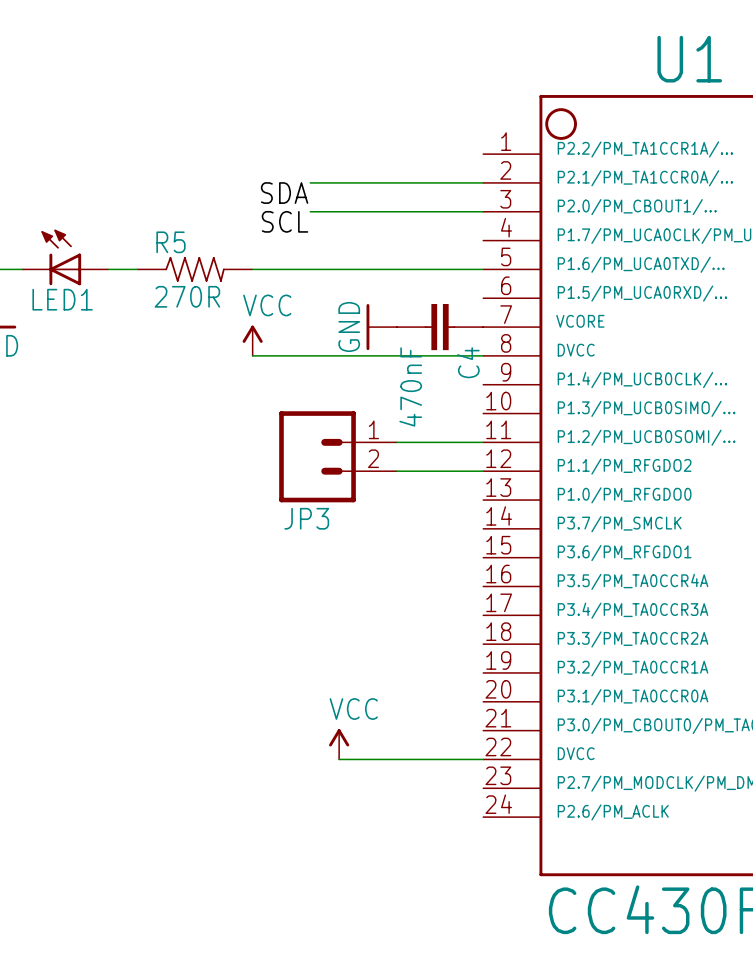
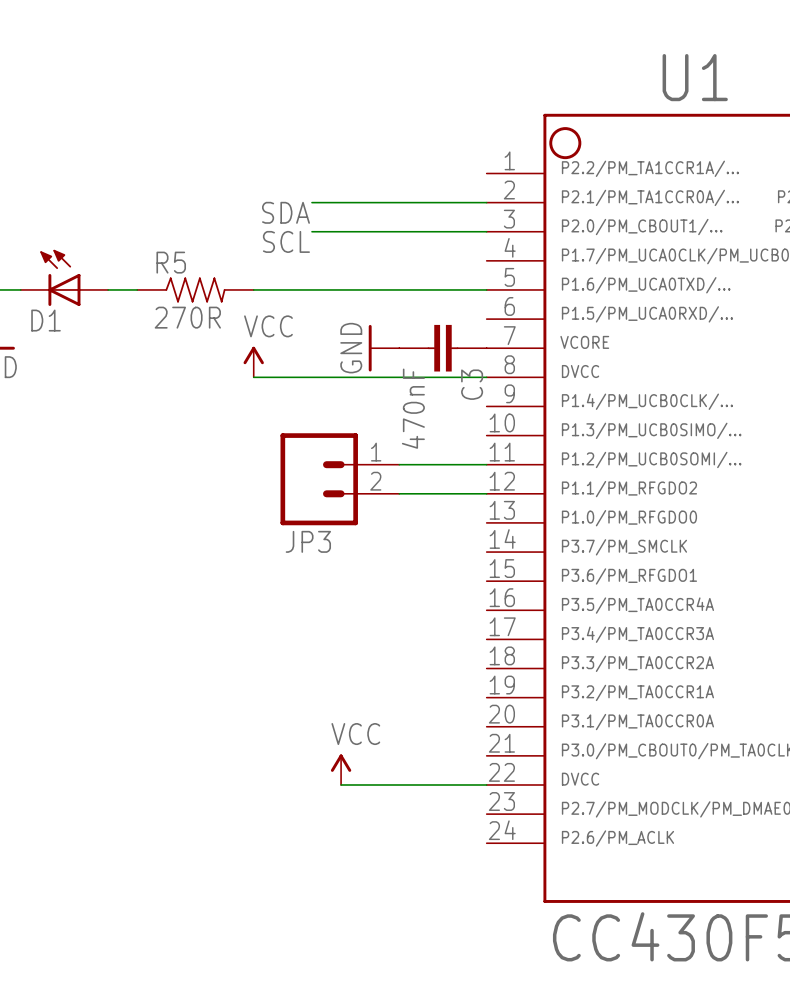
LED1 name: LED1 (62, 299) -> D1 (46, 320)
C4 name: C4 (468, 362) -> C3 (472, 384)

